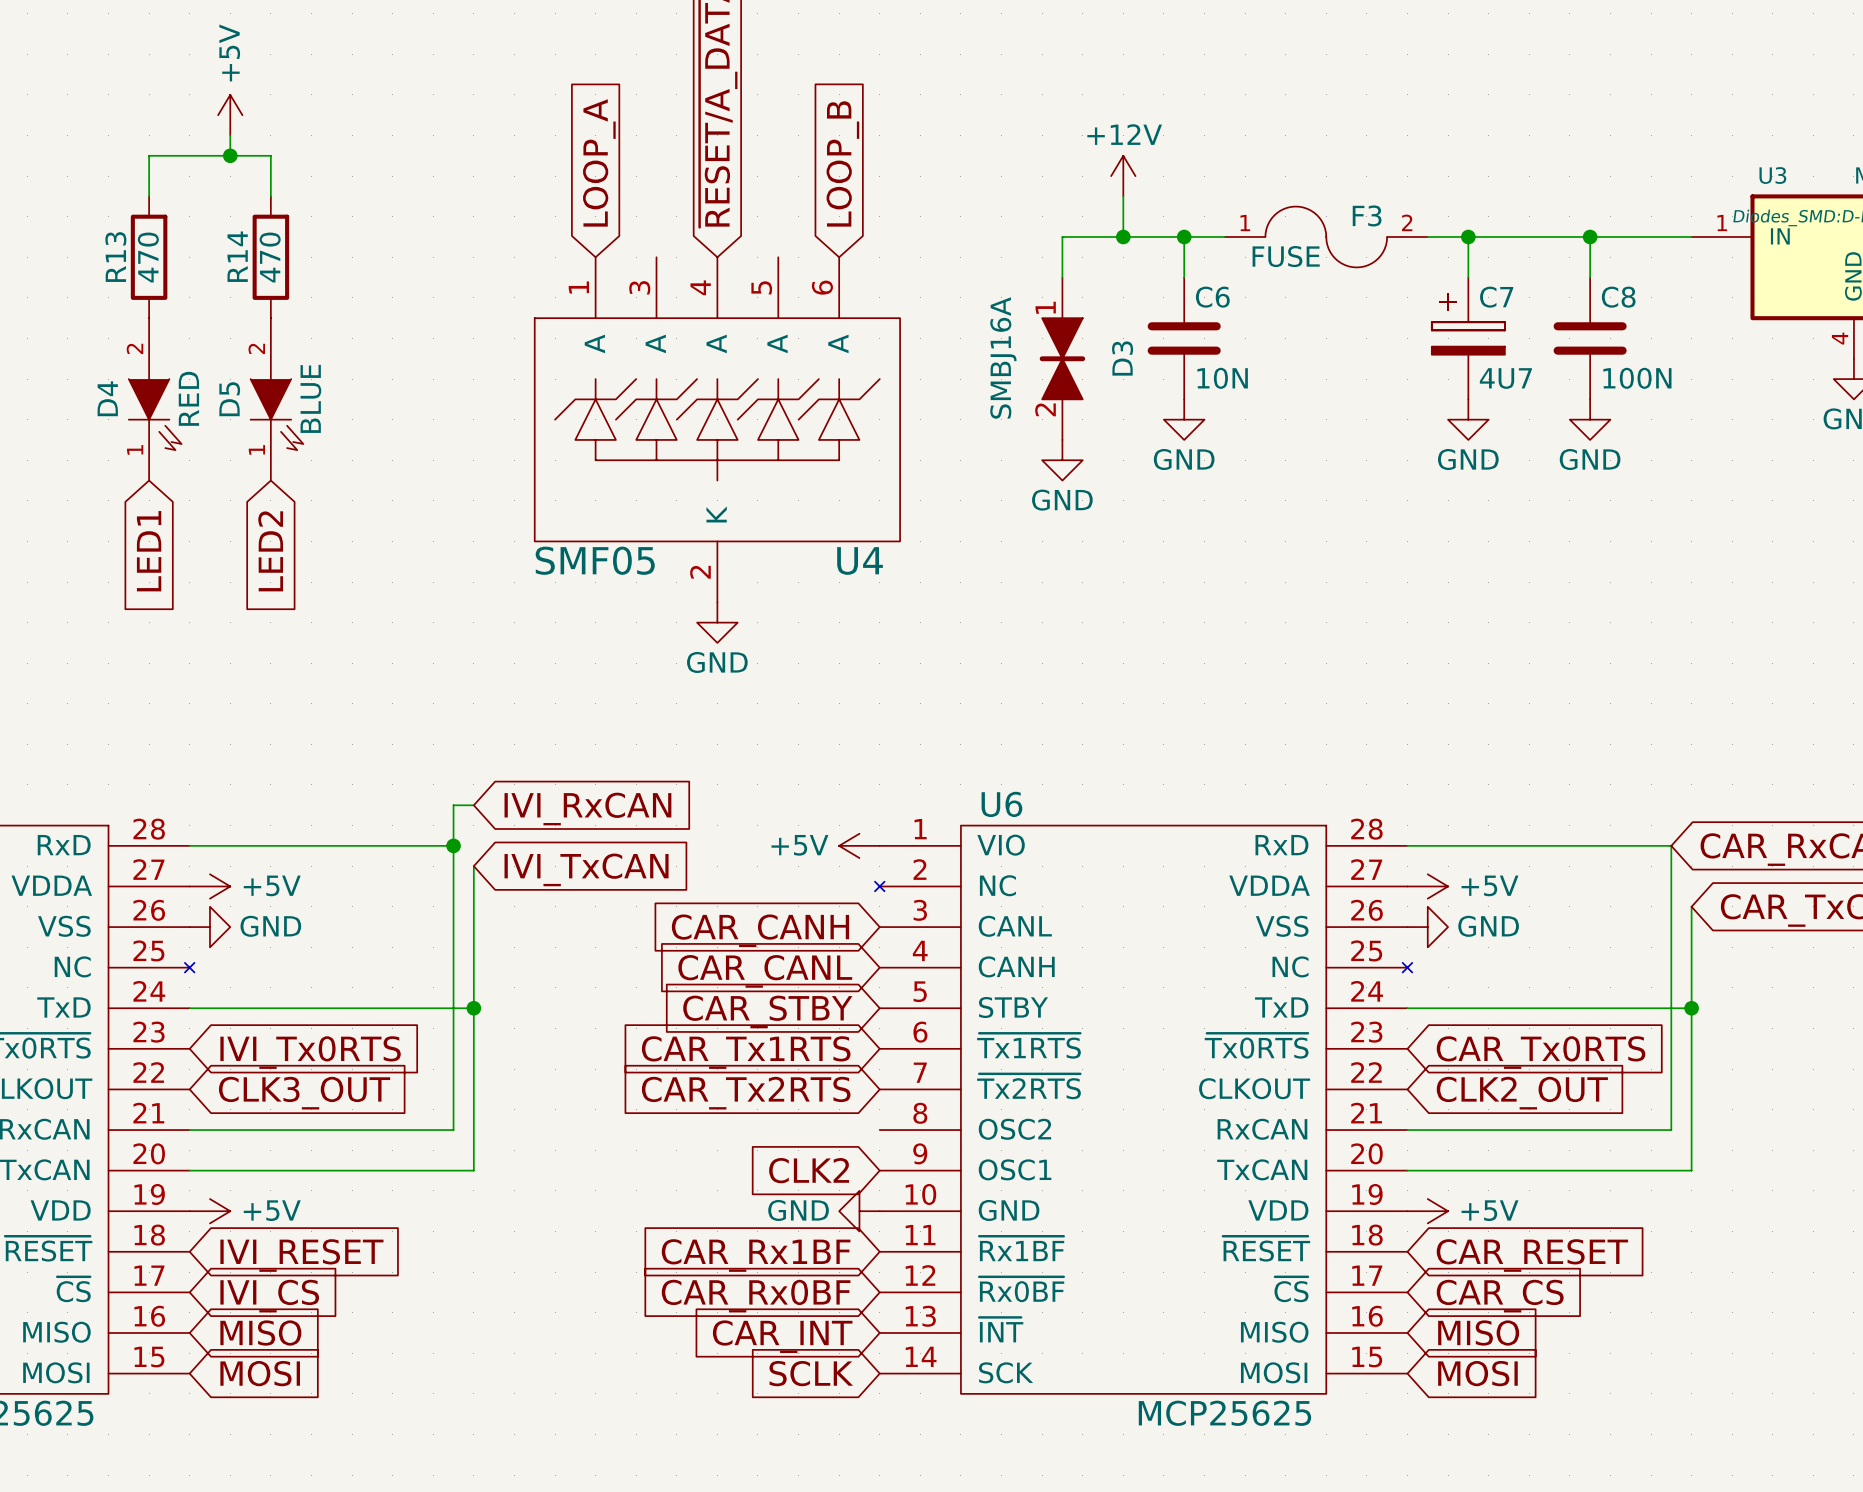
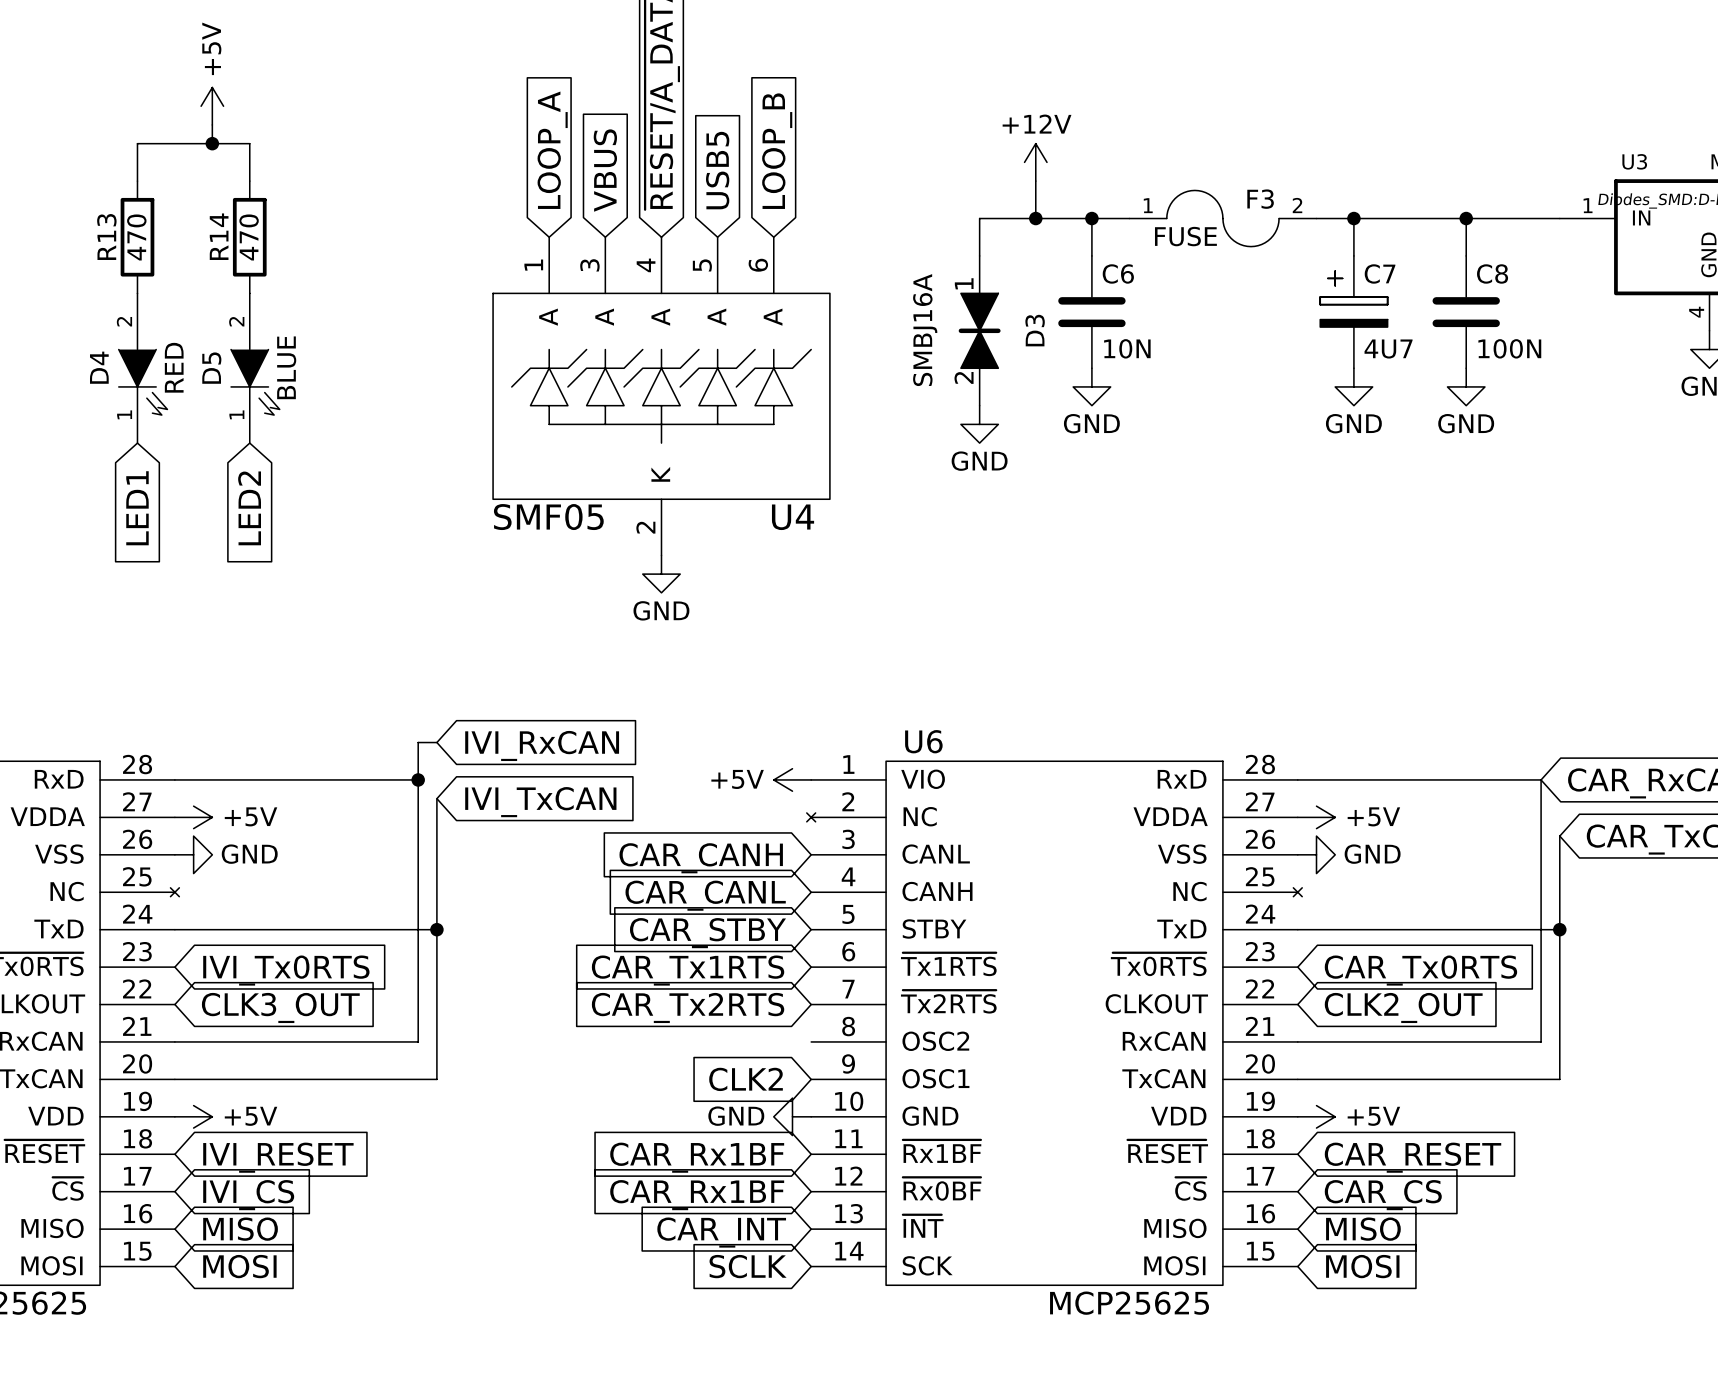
global label: none -> VBUS (605, 170)
global label: none -> USB5 (717, 170)
global label: CAR_Rx0BF (756, 1296) -> CAR_Rx1BF (697, 1195)

